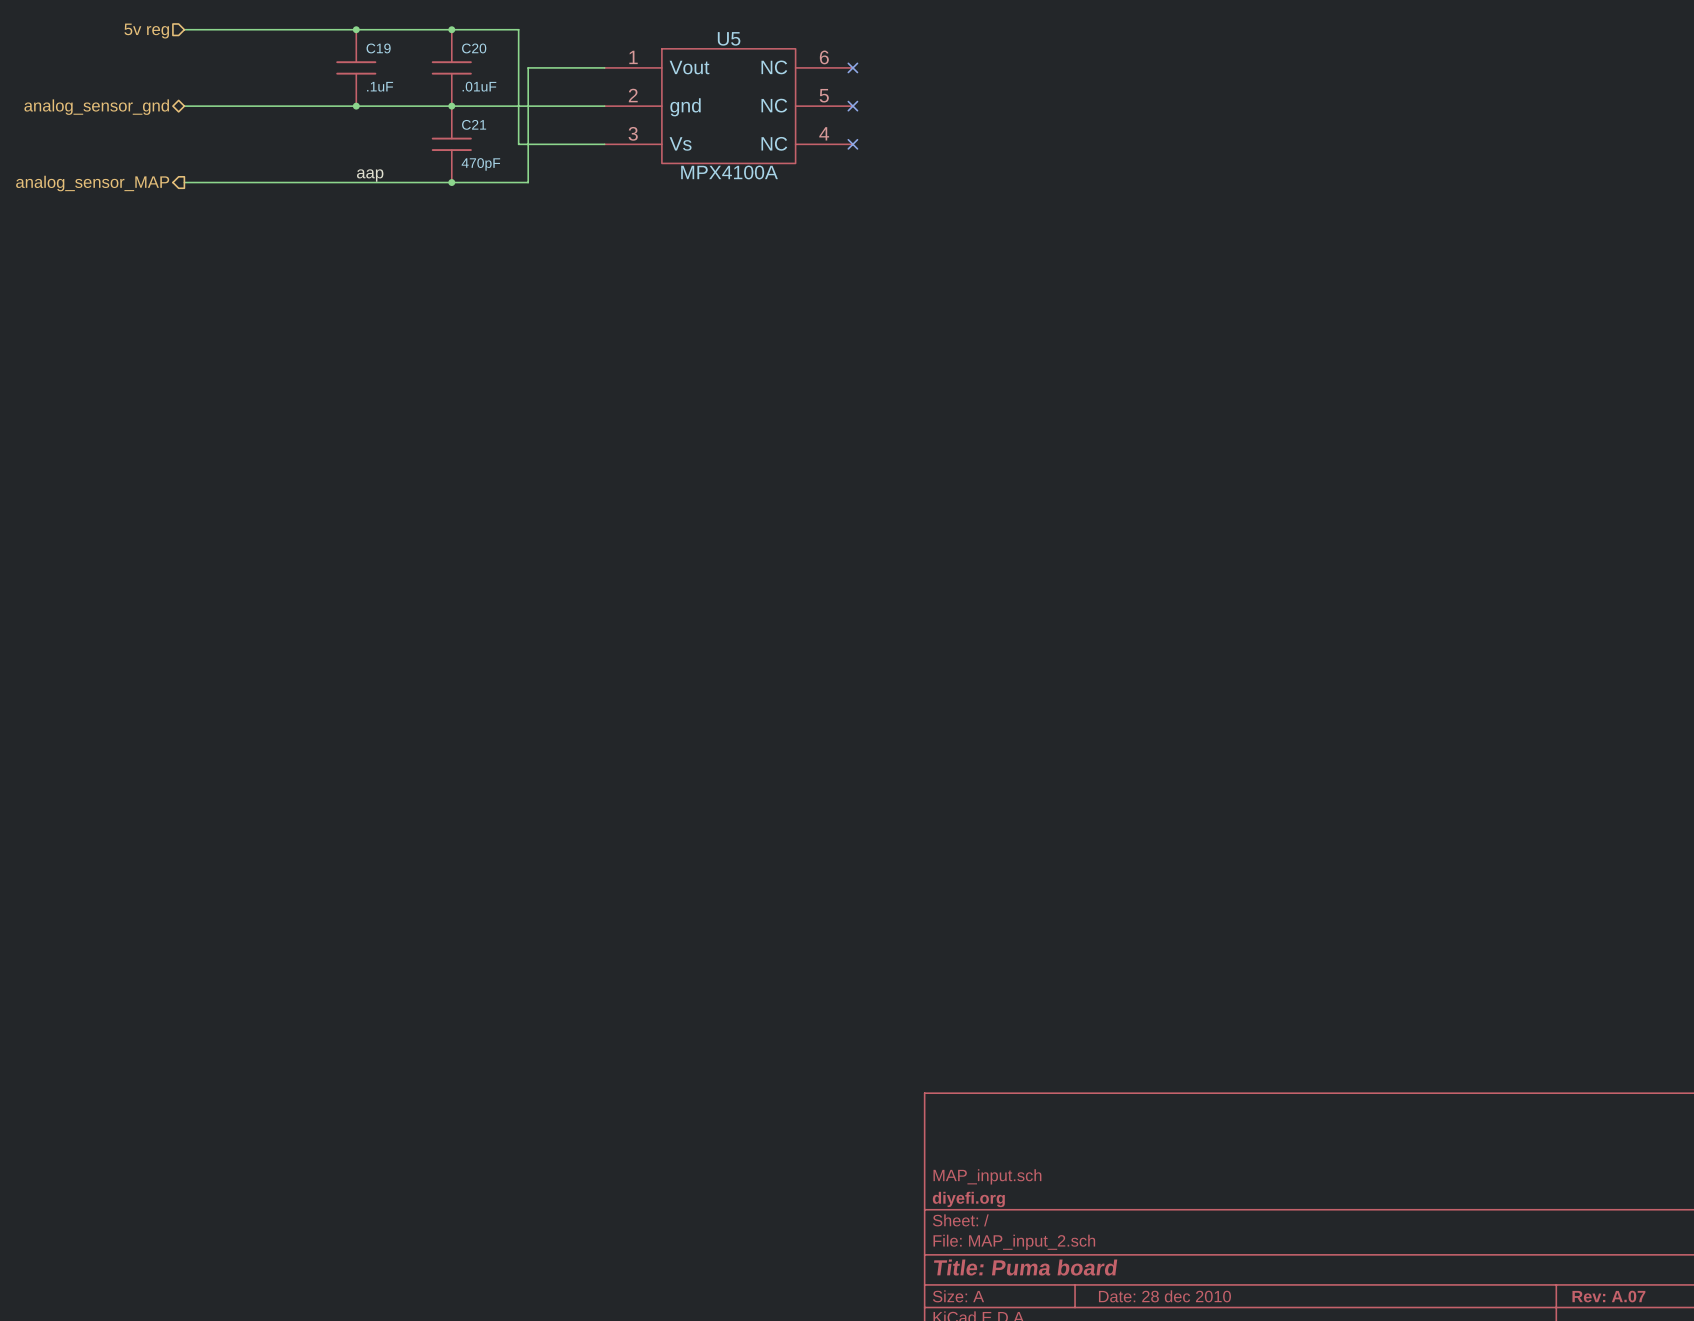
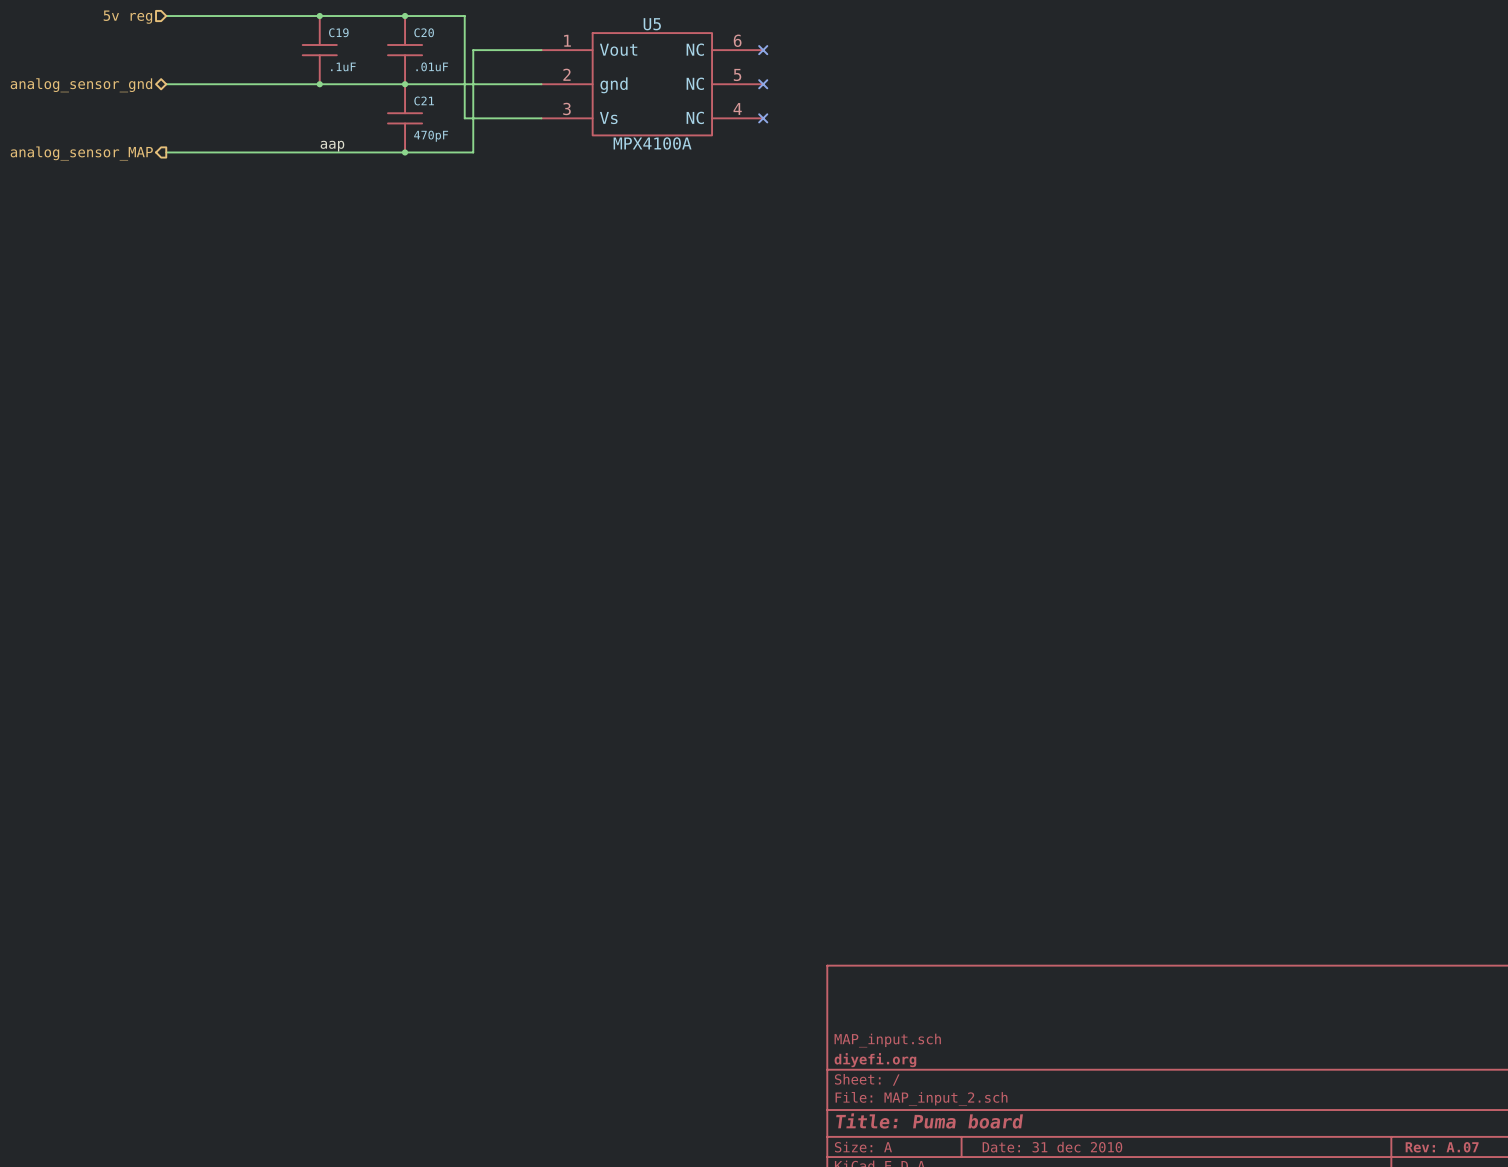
title block: Date: 28 dec 2010 (1164, 1296) -> Date: 31 dec 2010 (1052, 1147)

